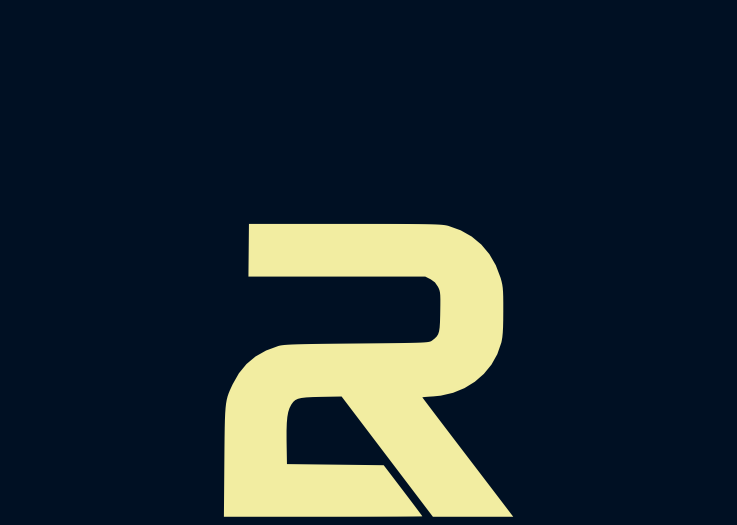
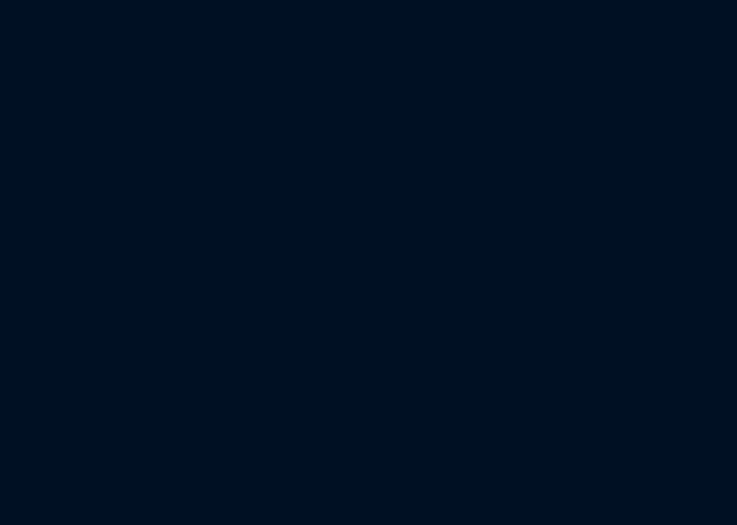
drawing: [223, 223, 514, 517] -> none

